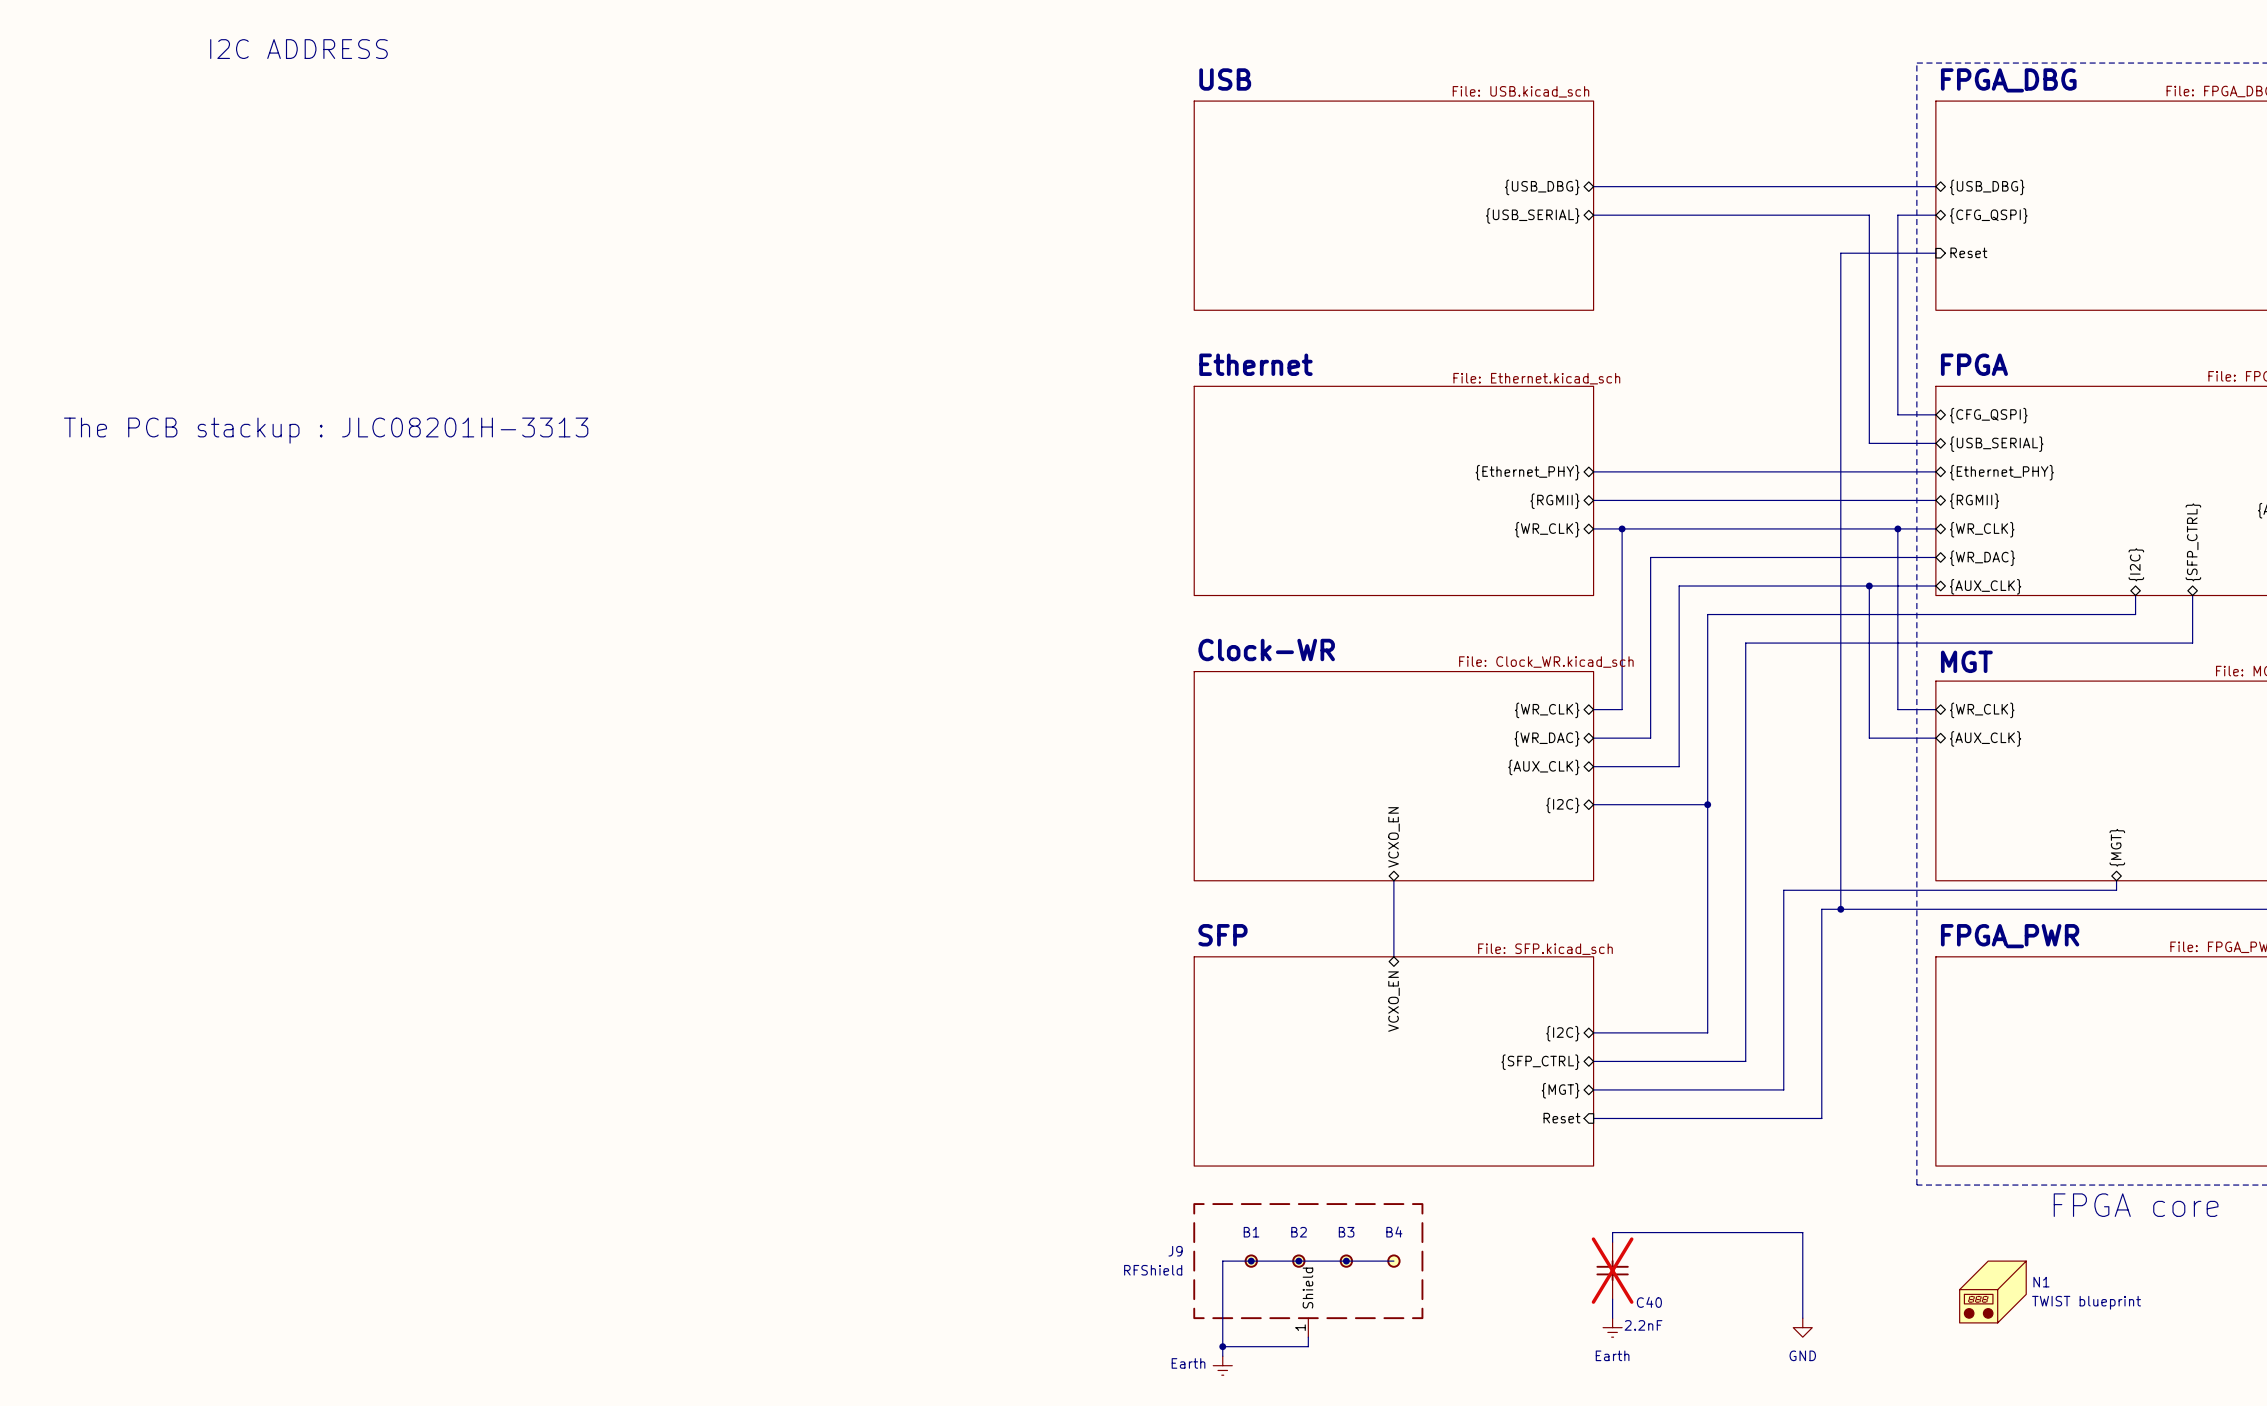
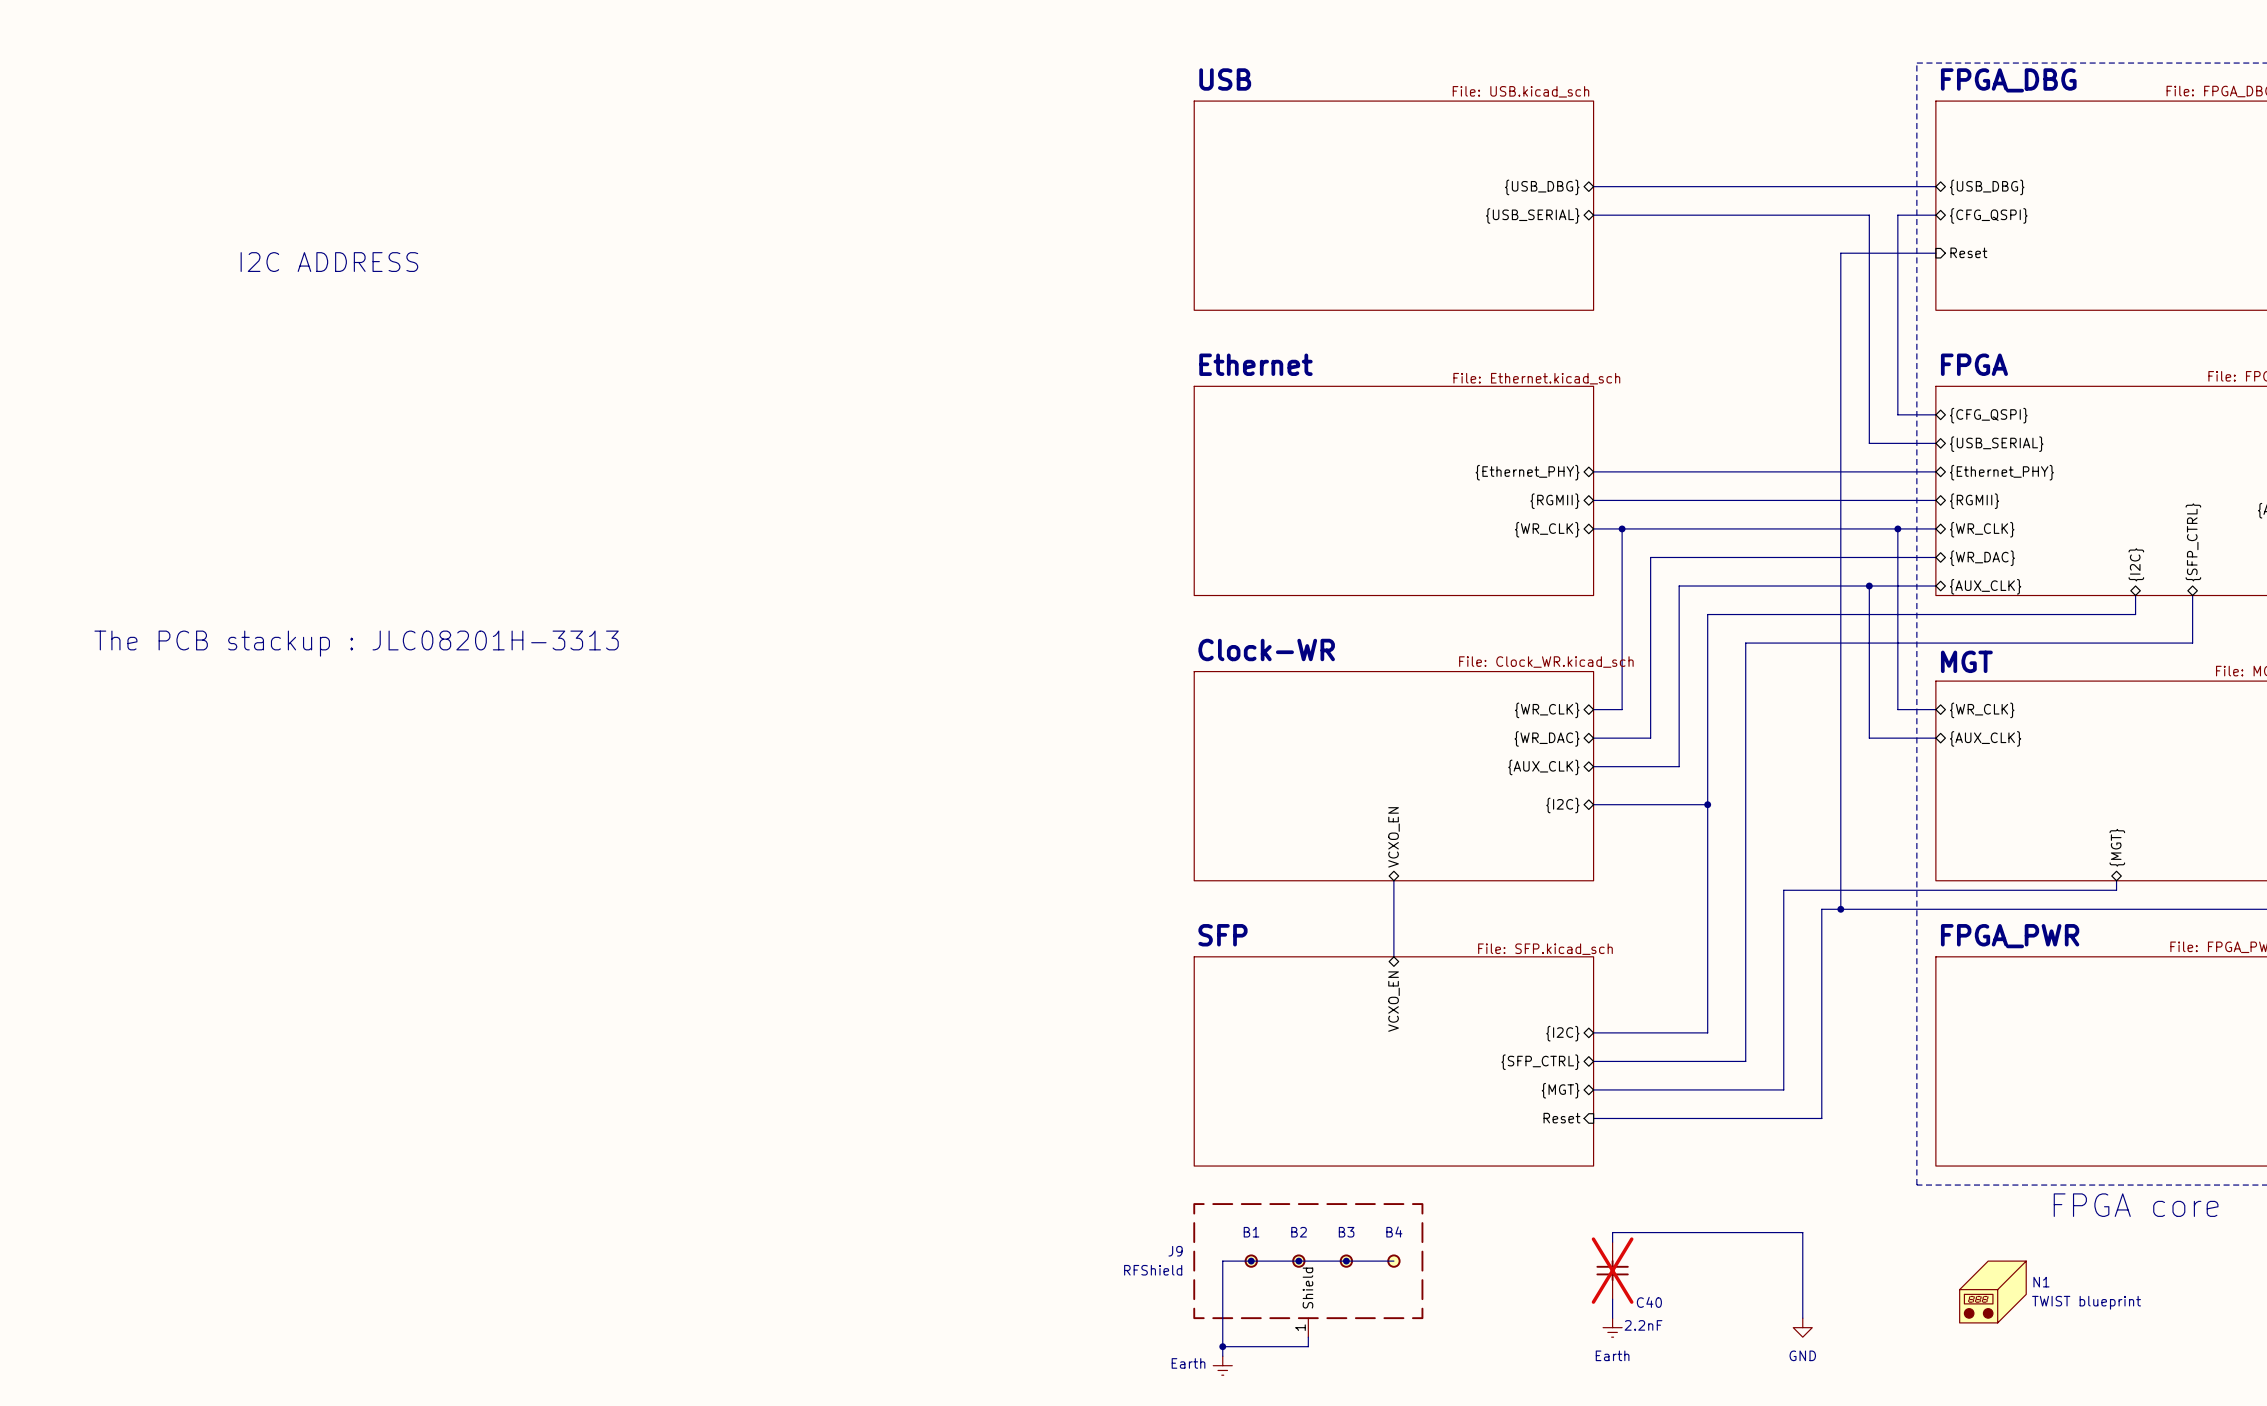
text: I2C ADDRESS (298, 49) -> none
text: none -> I2C ADDRESS (329, 262)
text: The PCB stackup : JLC08201H-3313 (326, 430) -> none
text: none -> The PCB stackup : JLC08201H-3313 (356, 643)

